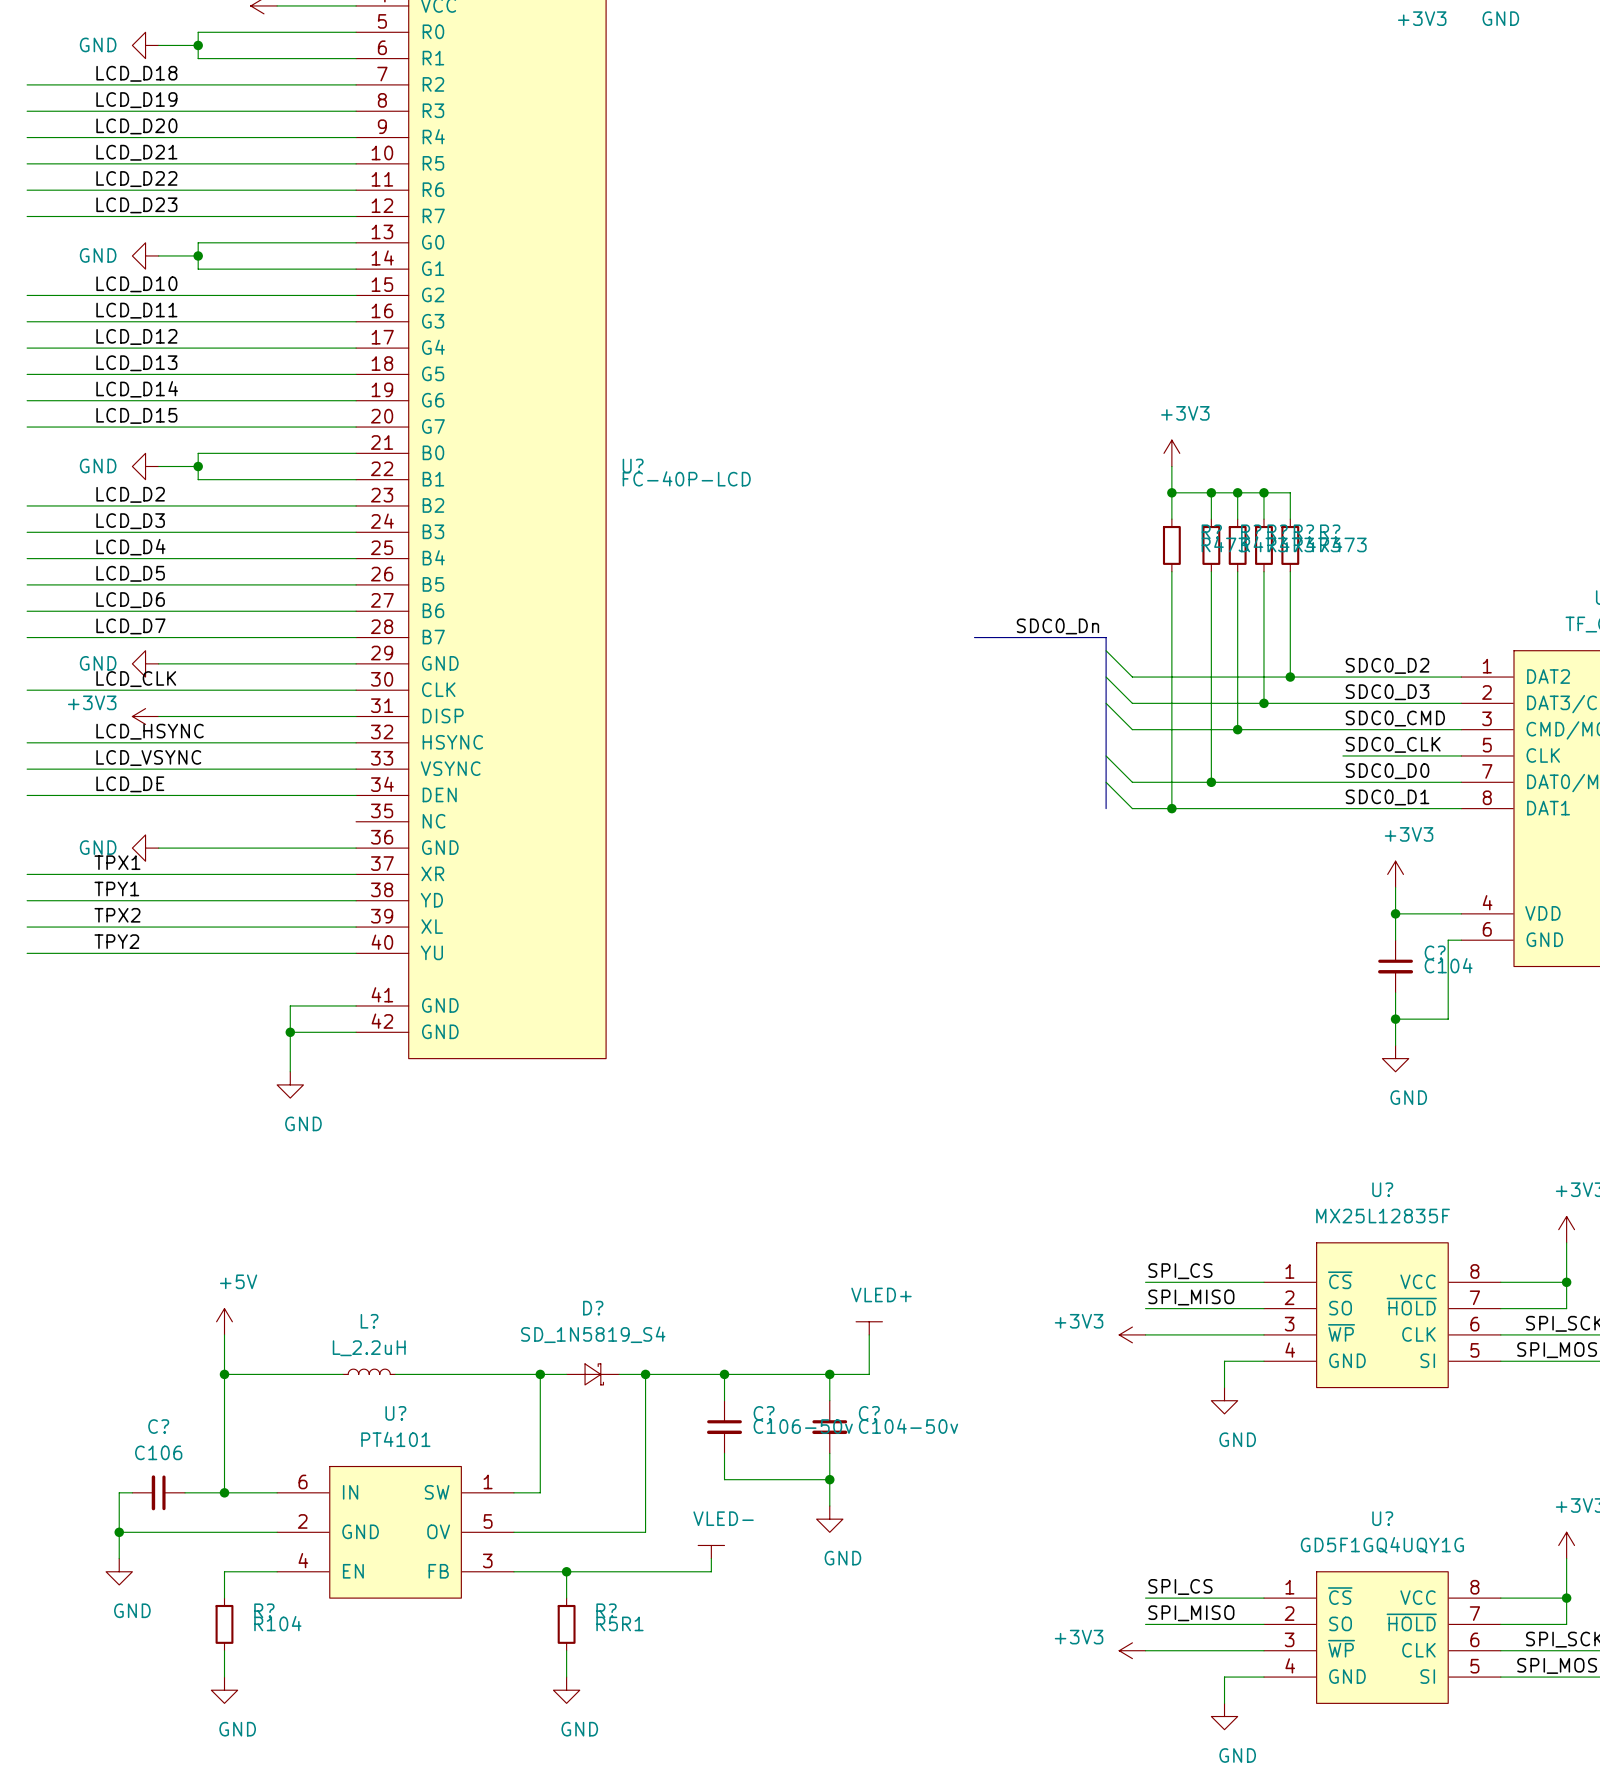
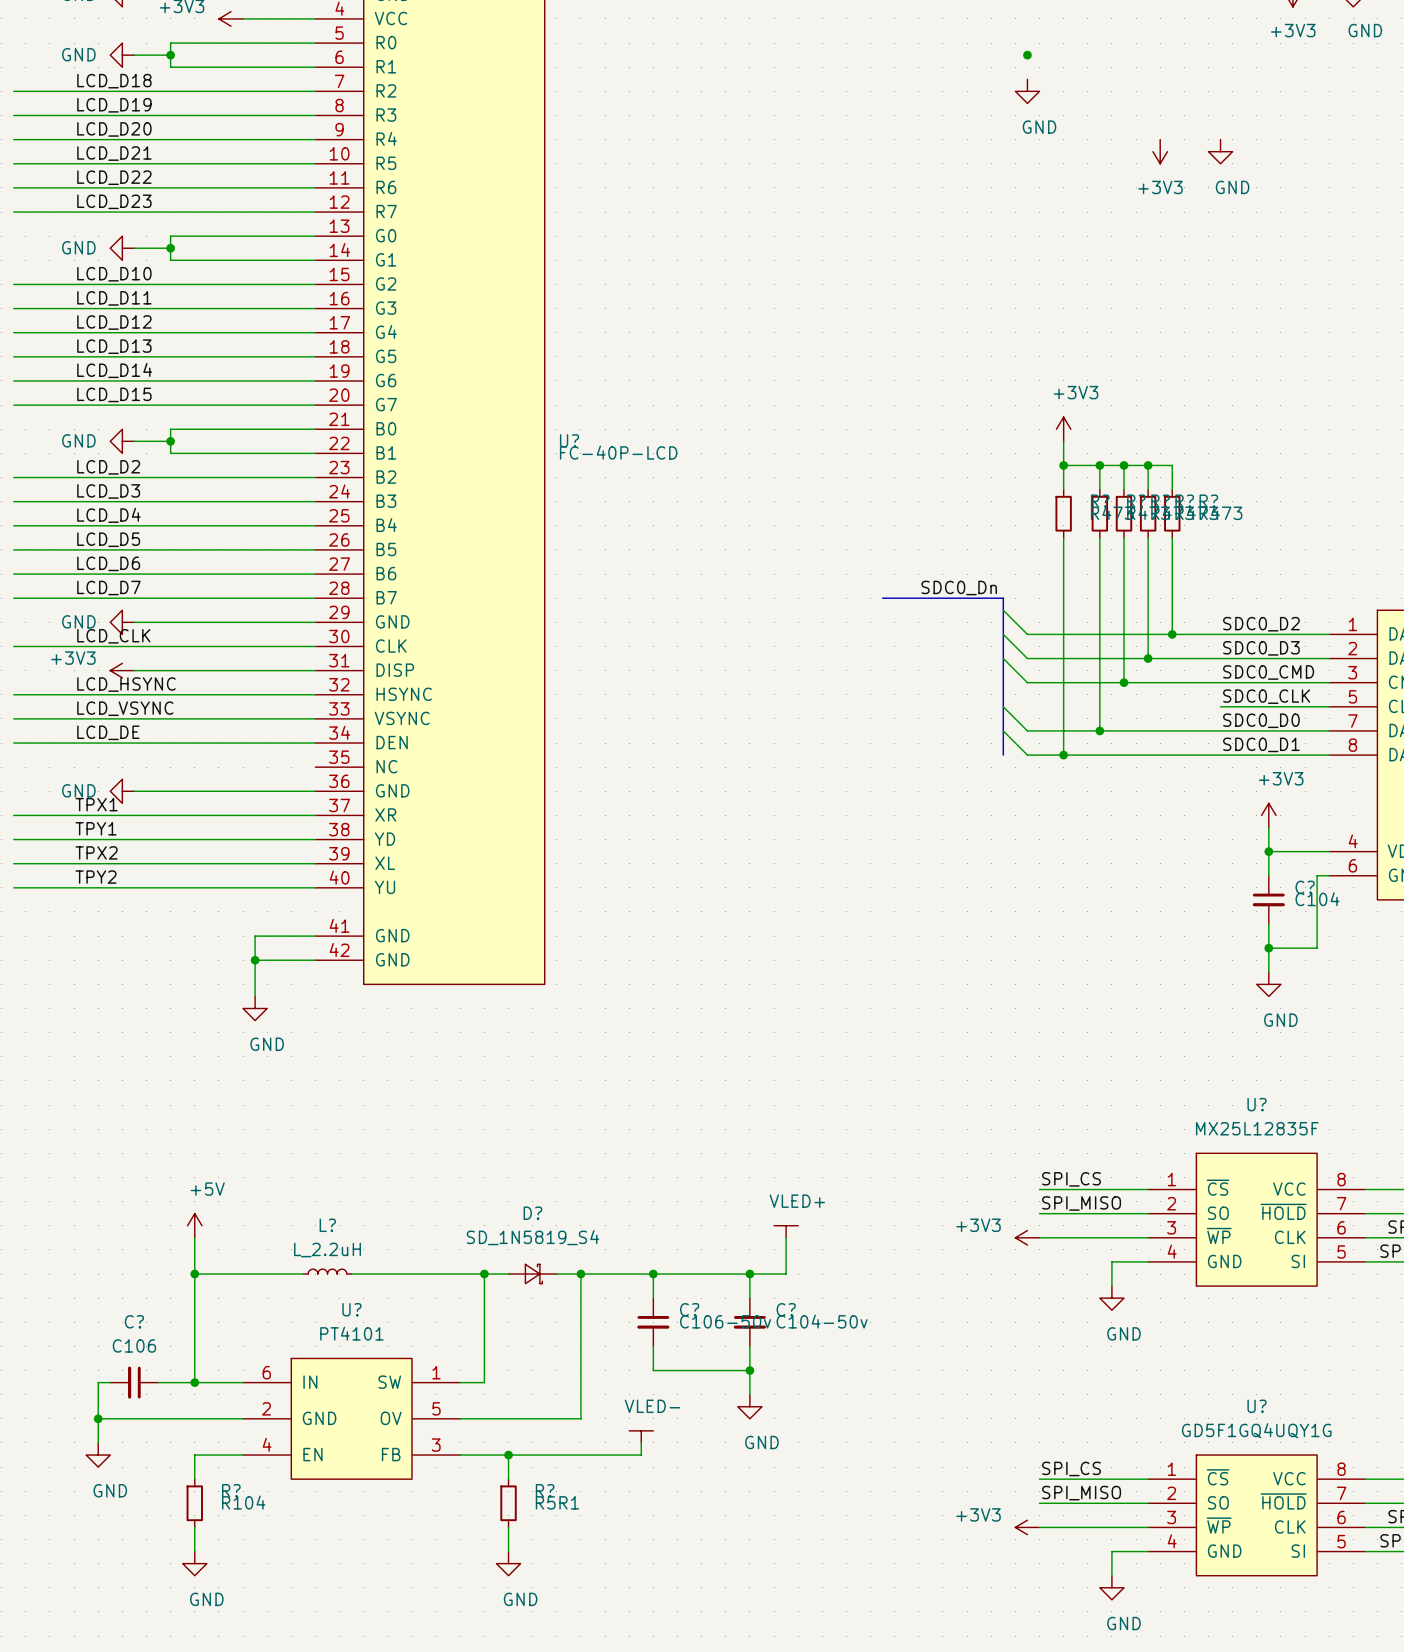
junction: none -> (1027, 55)
power symbol: none -> GND (1027, 91)
power symbol: none -> +3V3 (1160, 151)
power symbol: none -> GND (1220, 151)

